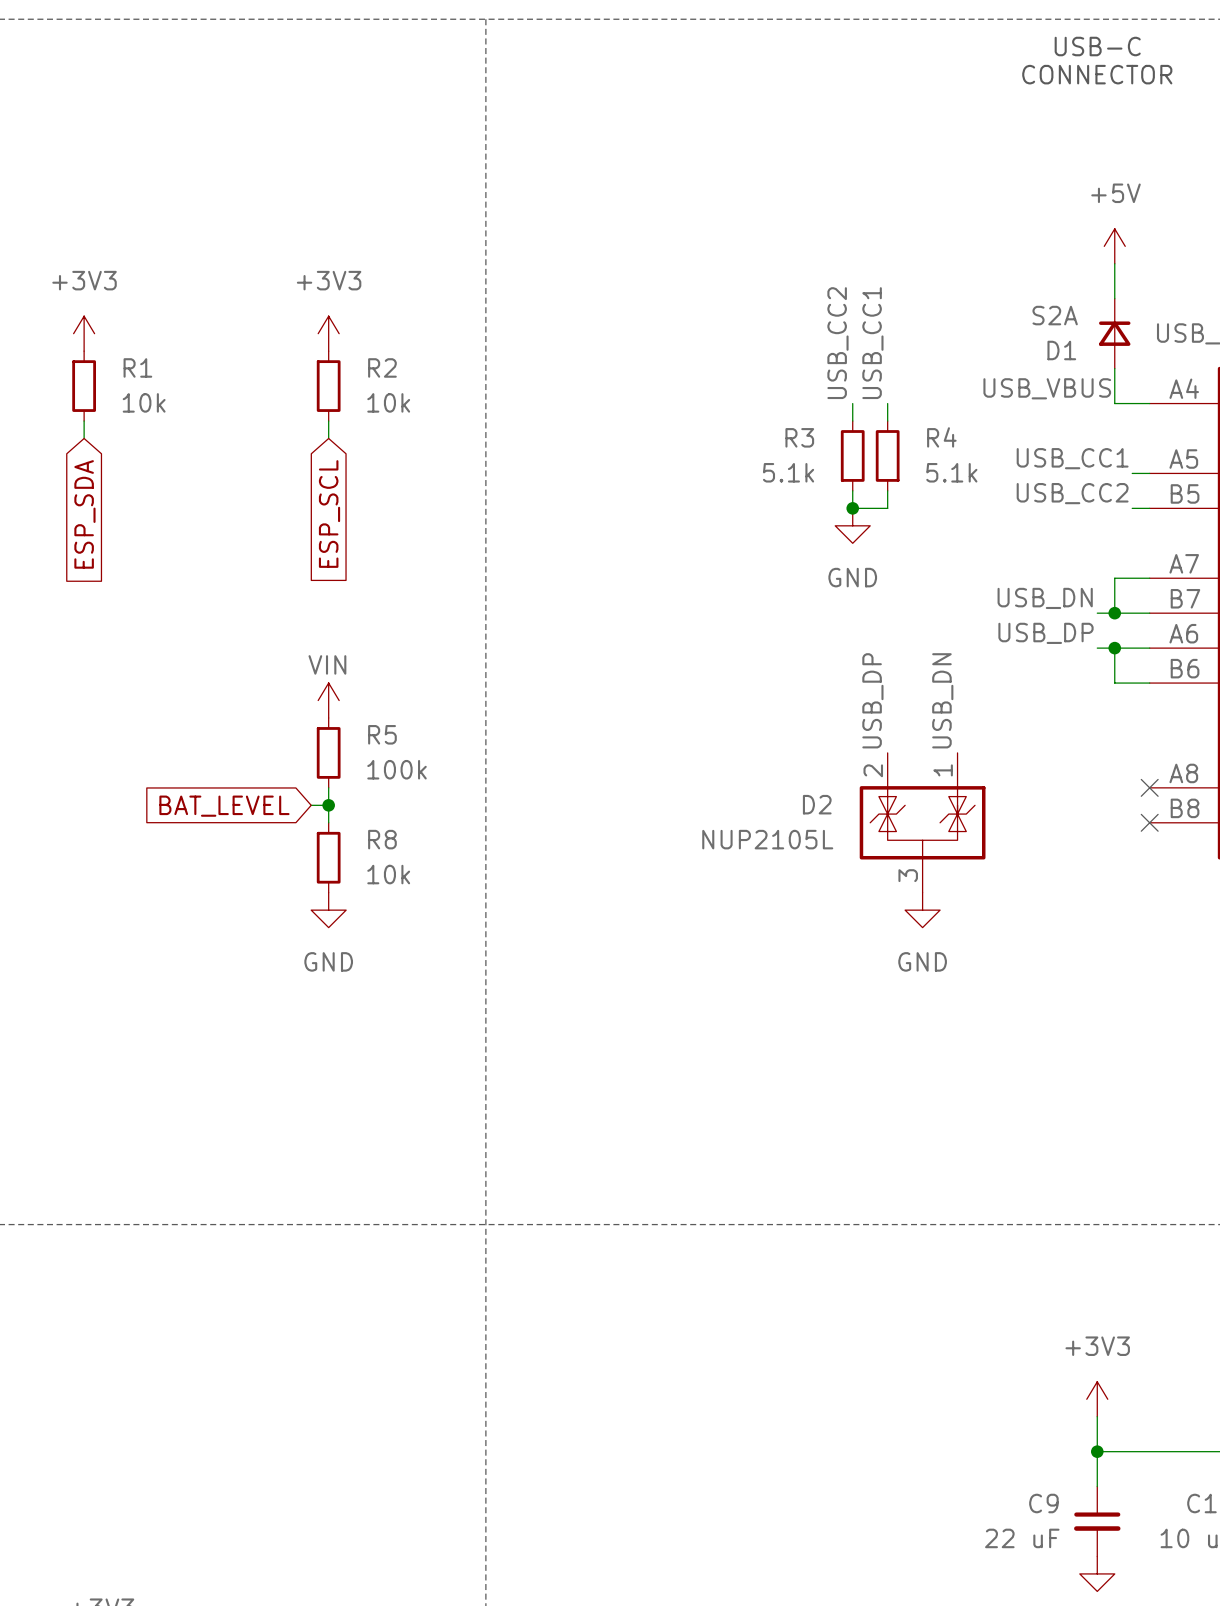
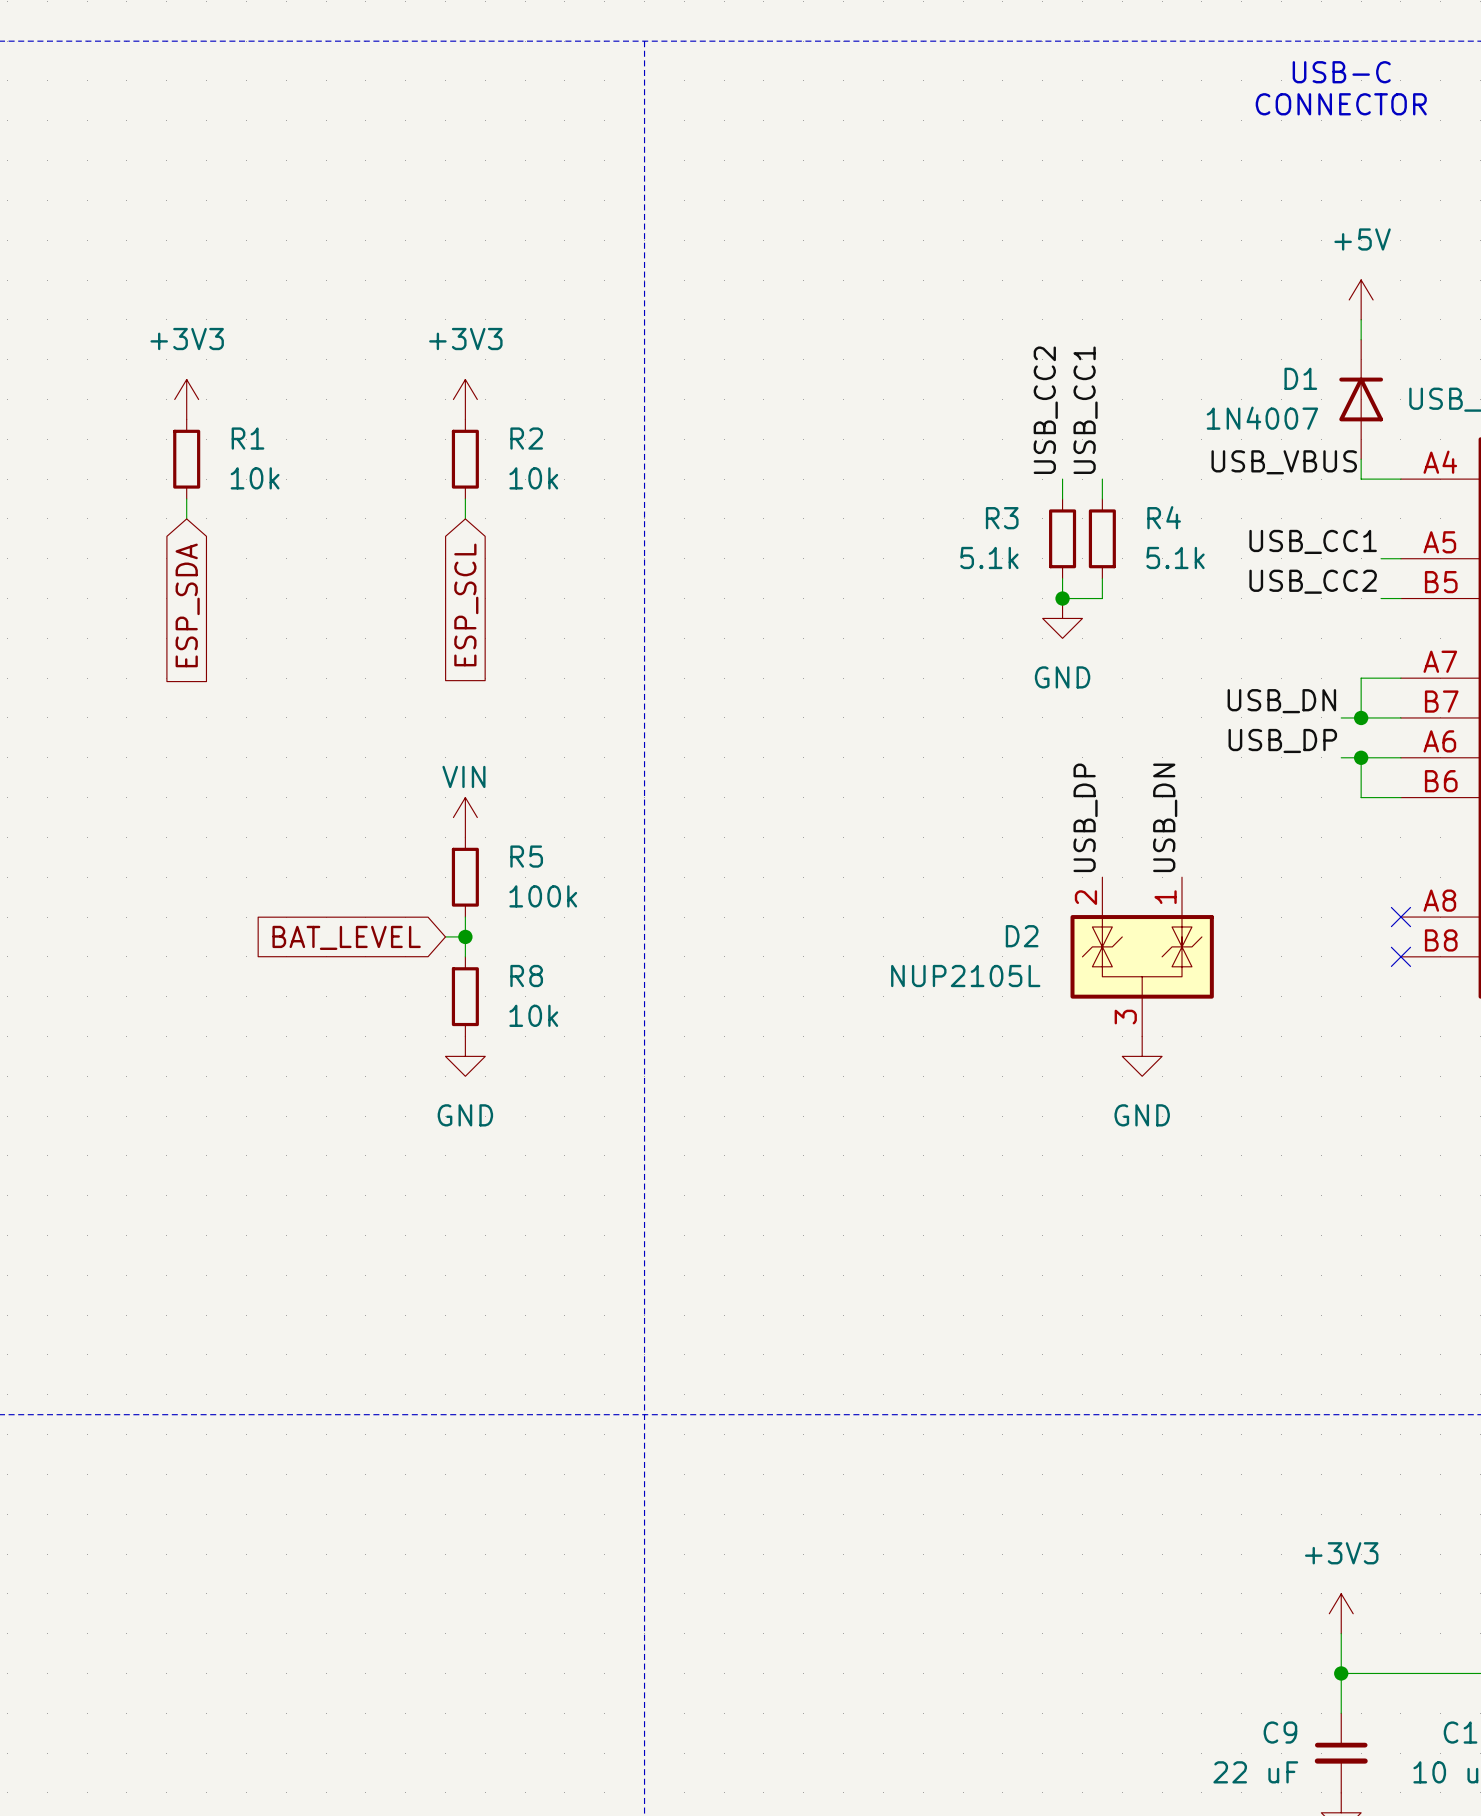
D1 symbol: [1099, 298, 1131, 369] -> [1339, 339, 1384, 460]
D1 value: S2A (1055, 315) -> 1N4007 (1262, 418)
D1 name position: D1 (1061, 350) -> D1 (1300, 378)

